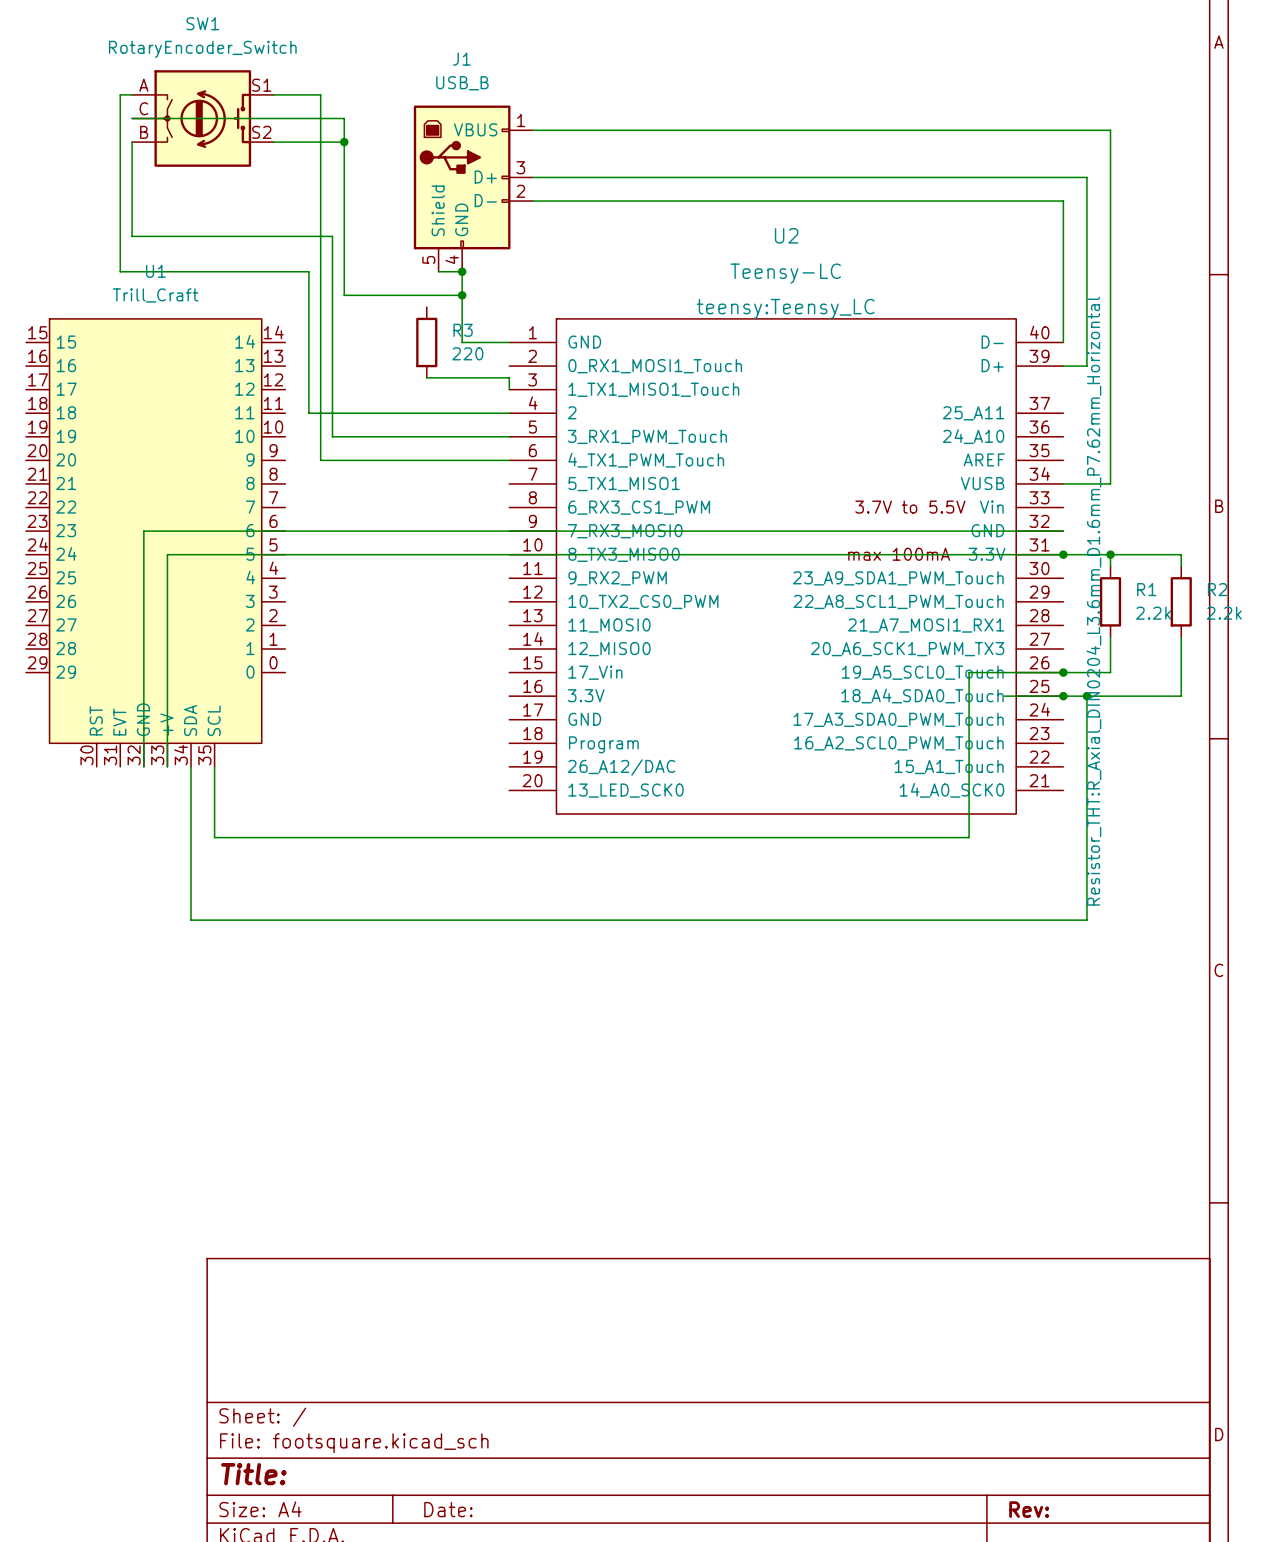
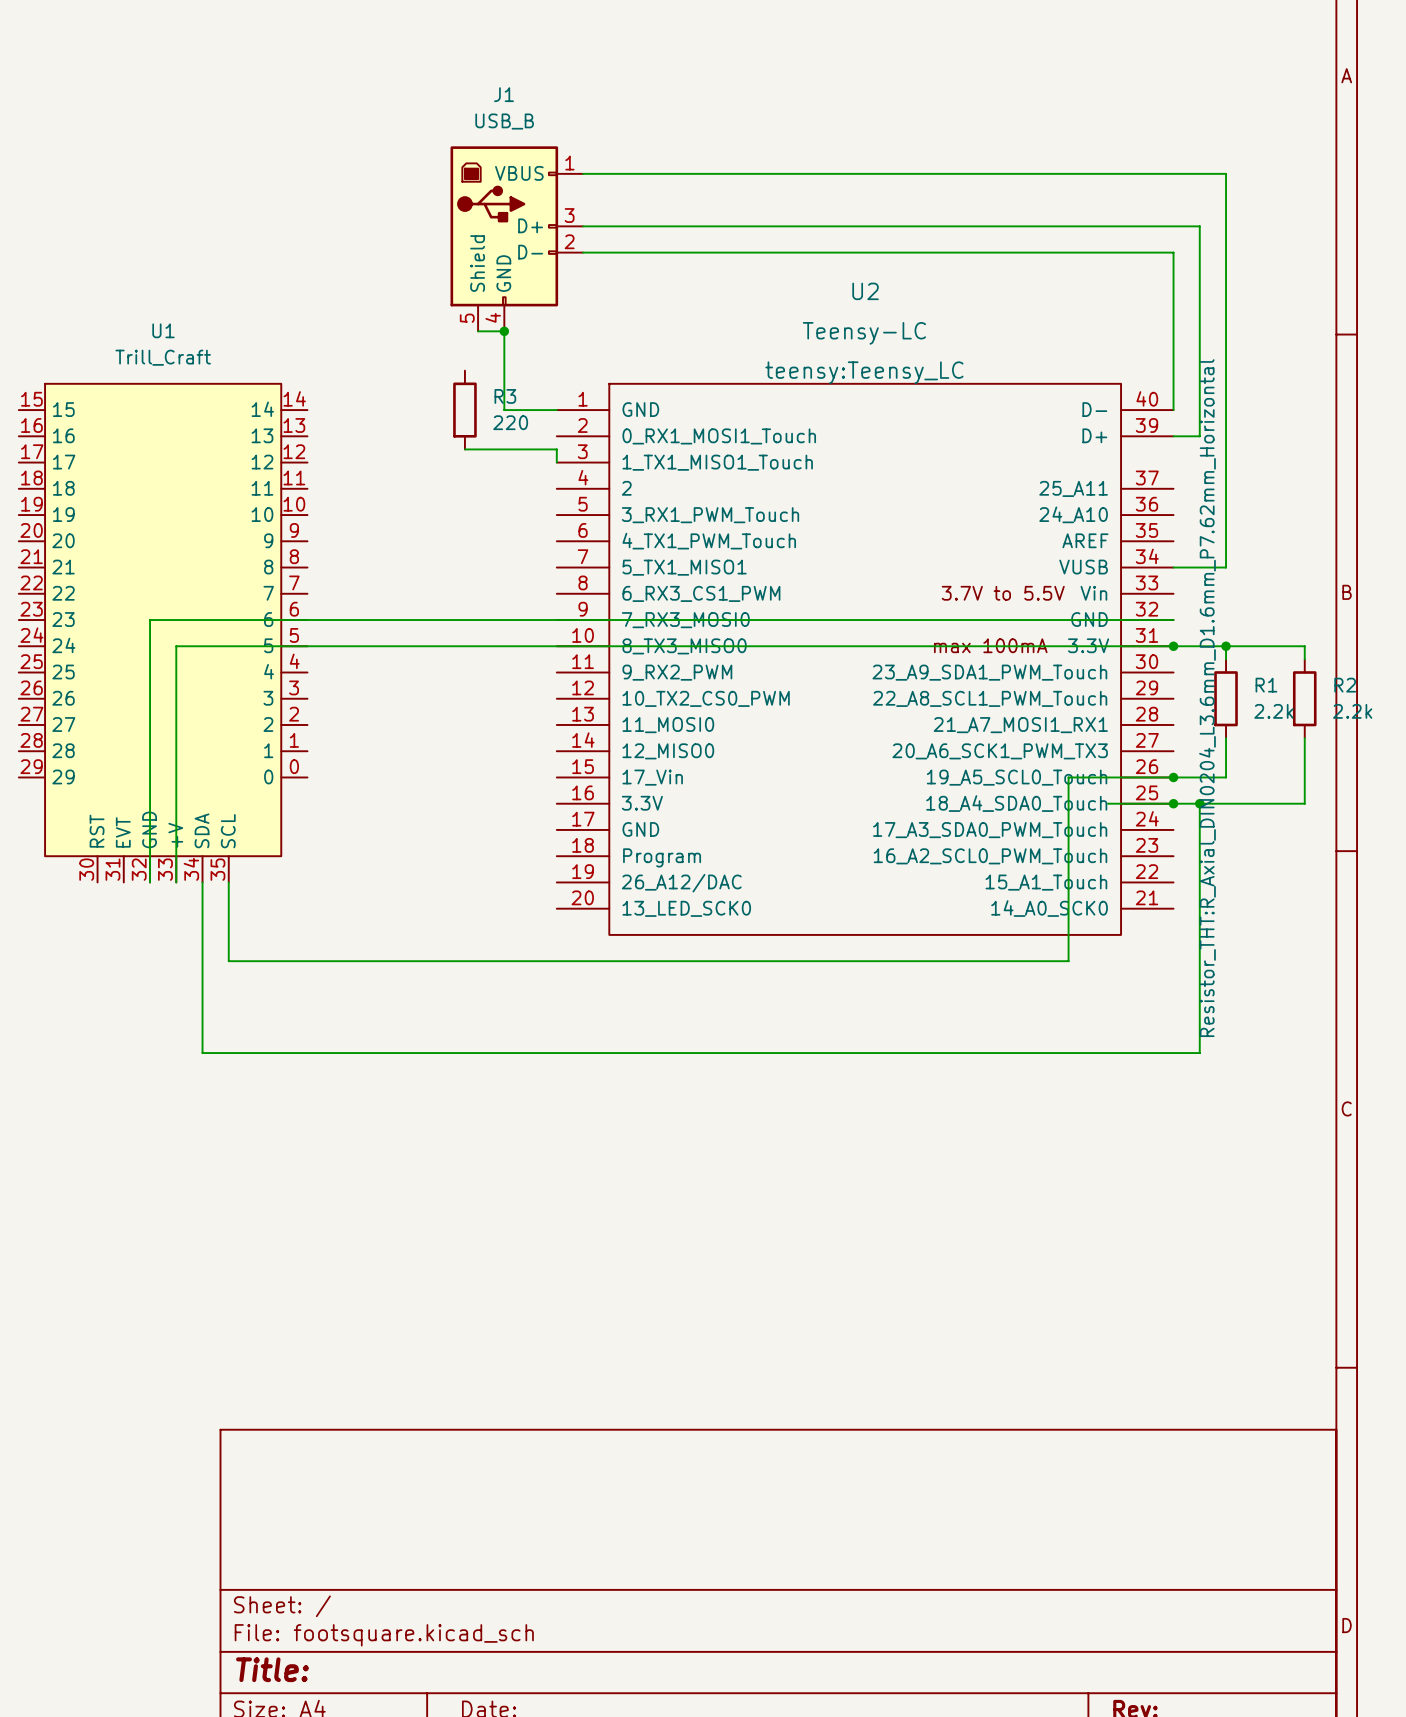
wire: (132, 94) (120, 94) (120, 271) (308, 271) (308, 413) (509, 413) -> none
wire: (273, 94) (320, 94) (320, 460) (509, 460) -> none
wire: (132, 118) (344, 118) (344, 295) (462, 295) -> none
SW1: RotaryEncoder_Switch (202, 118) -> none
wire: (132, 142) (132, 236) (332, 236) (332, 436) (509, 436) -> none
wire: (273, 142) (344, 142) -> none
junction: (344, 142) -> none
junction: (462, 295) -> none

